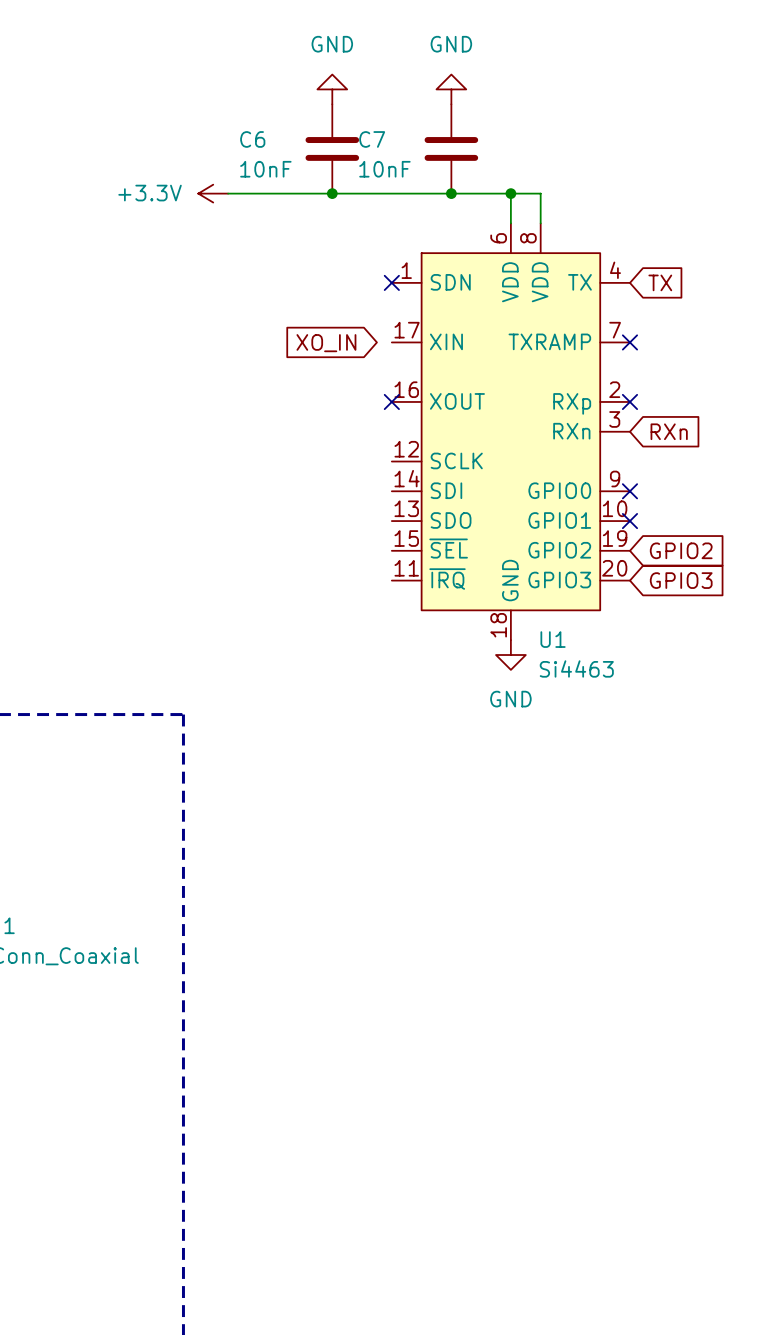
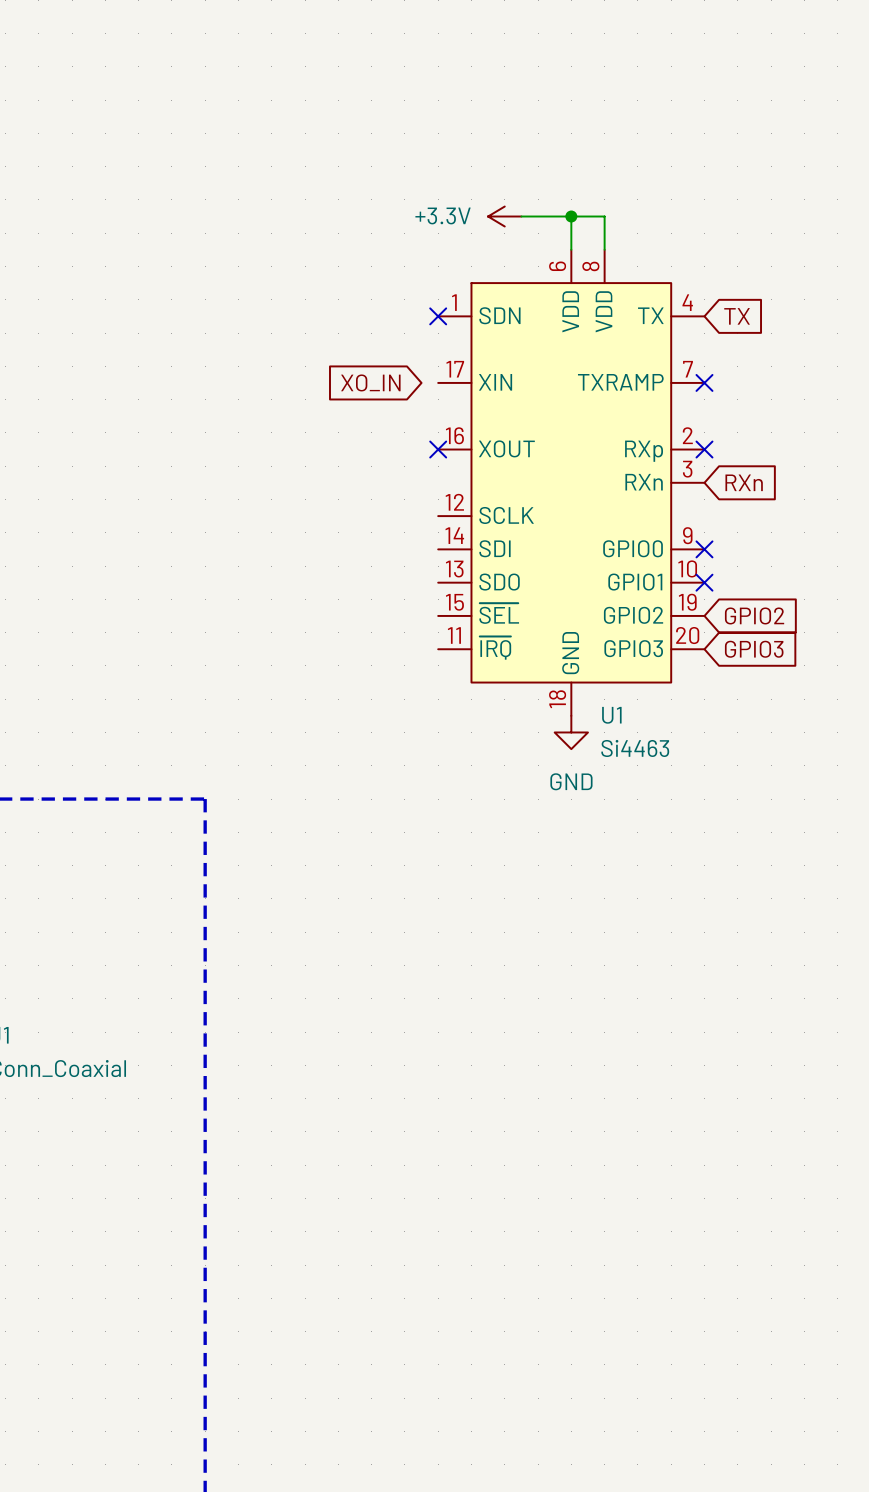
power symbol: GND (332, 89) -> none
power symbol: GND (451, 89) -> none
C6: 10nF (332, 148) -> none
C7: 10nF (451, 148) -> none
power symbol position: +3.3V (213, 193) -> +3.3V (504, 216)
wire: (228, 193) (466, 193) -> none
junction: (332, 193) -> none
junction: (451, 193) -> none

